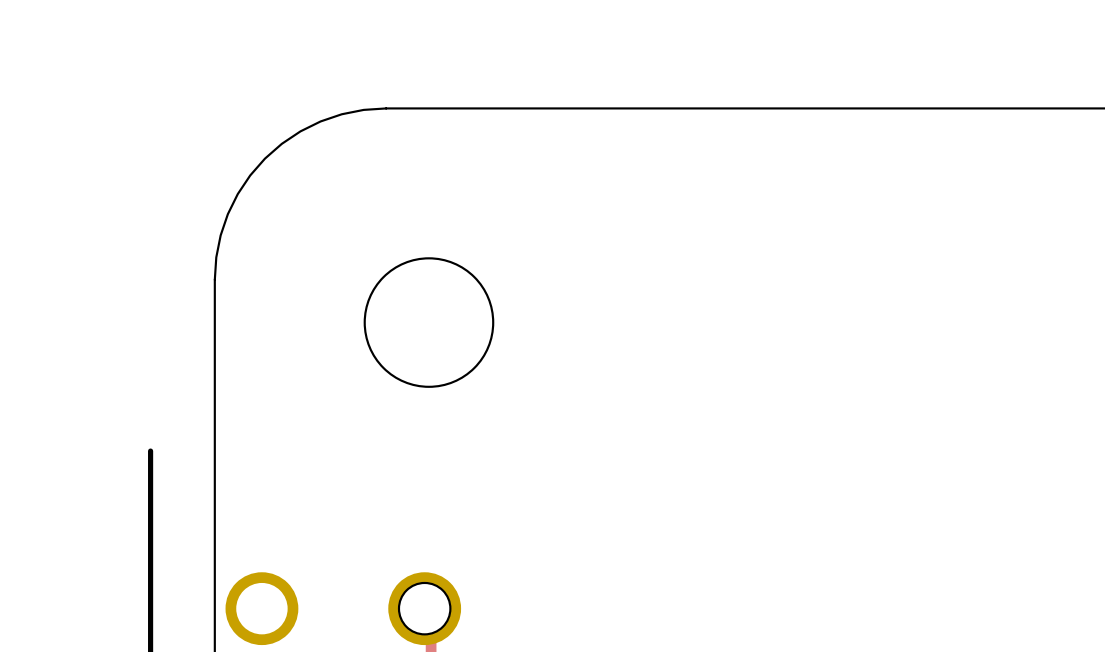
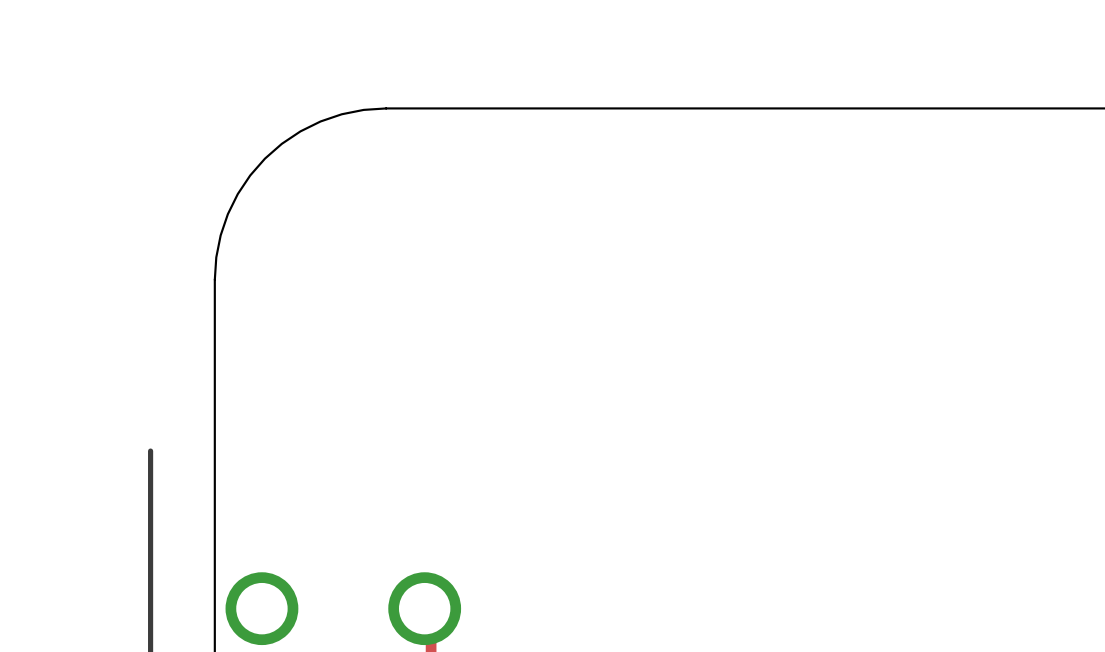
round board edge: [363, 257, 495, 388] -> none
round board edge: [397, 581, 452, 636] -> none

